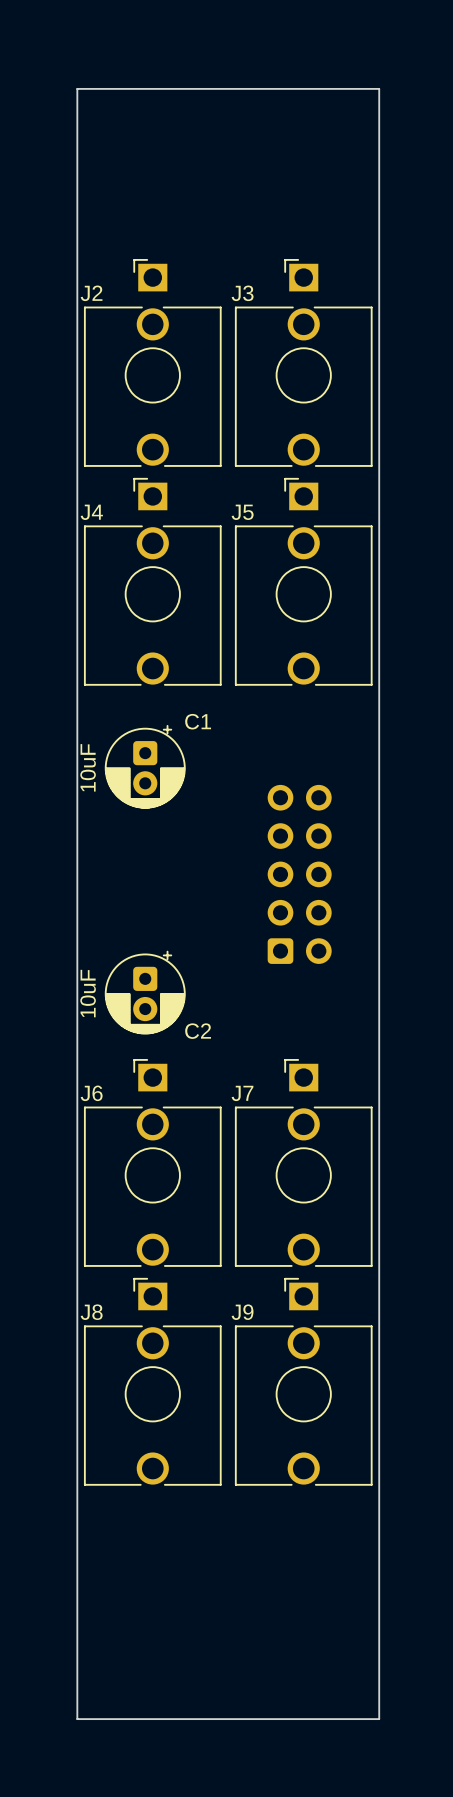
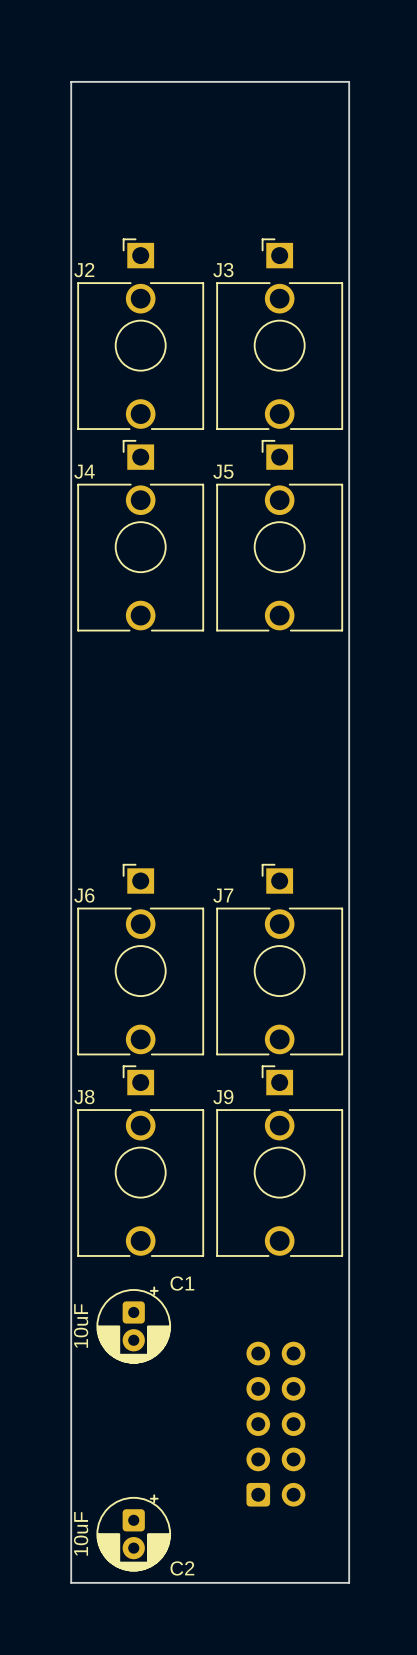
C1 position: (145, 766) -> (133, 1325)
part: (299, 874) -> none
C2 position: (145, 992) -> (133, 1532)
J6 position: (152, 1162) -> (140, 959)
J7 position: (303, 1162) -> (279, 959)
J8 position: (152, 1381) -> (140, 1161)
J9 position: (303, 1381) -> (279, 1161)
part: none -> (275, 1424)

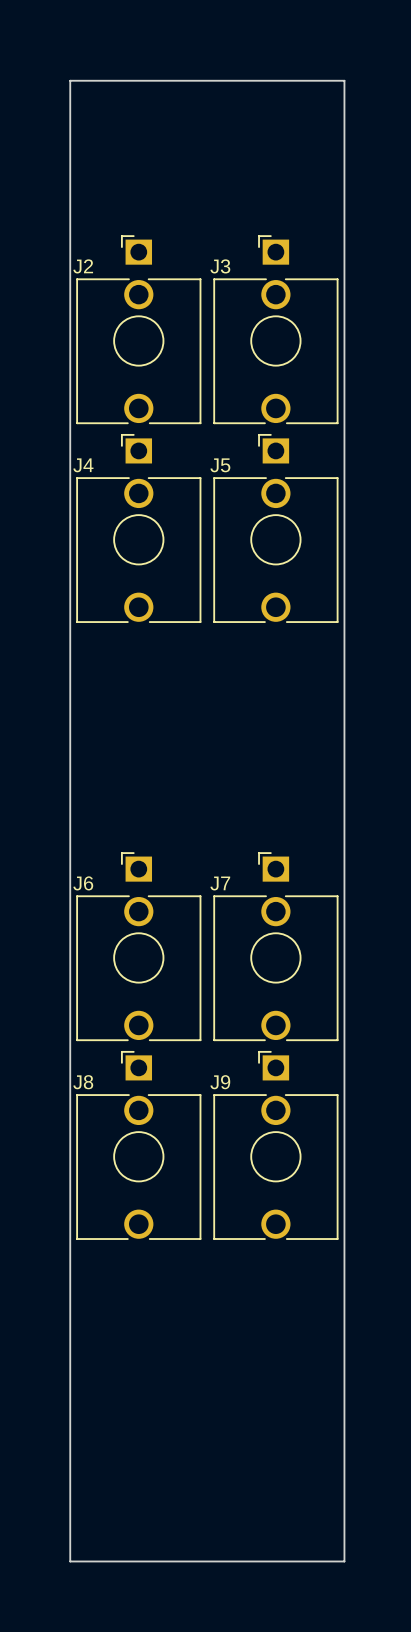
C1: 10uF (133, 1325) -> none
part: (275, 1424) -> none
C2: 10uF (133, 1532) -> none

